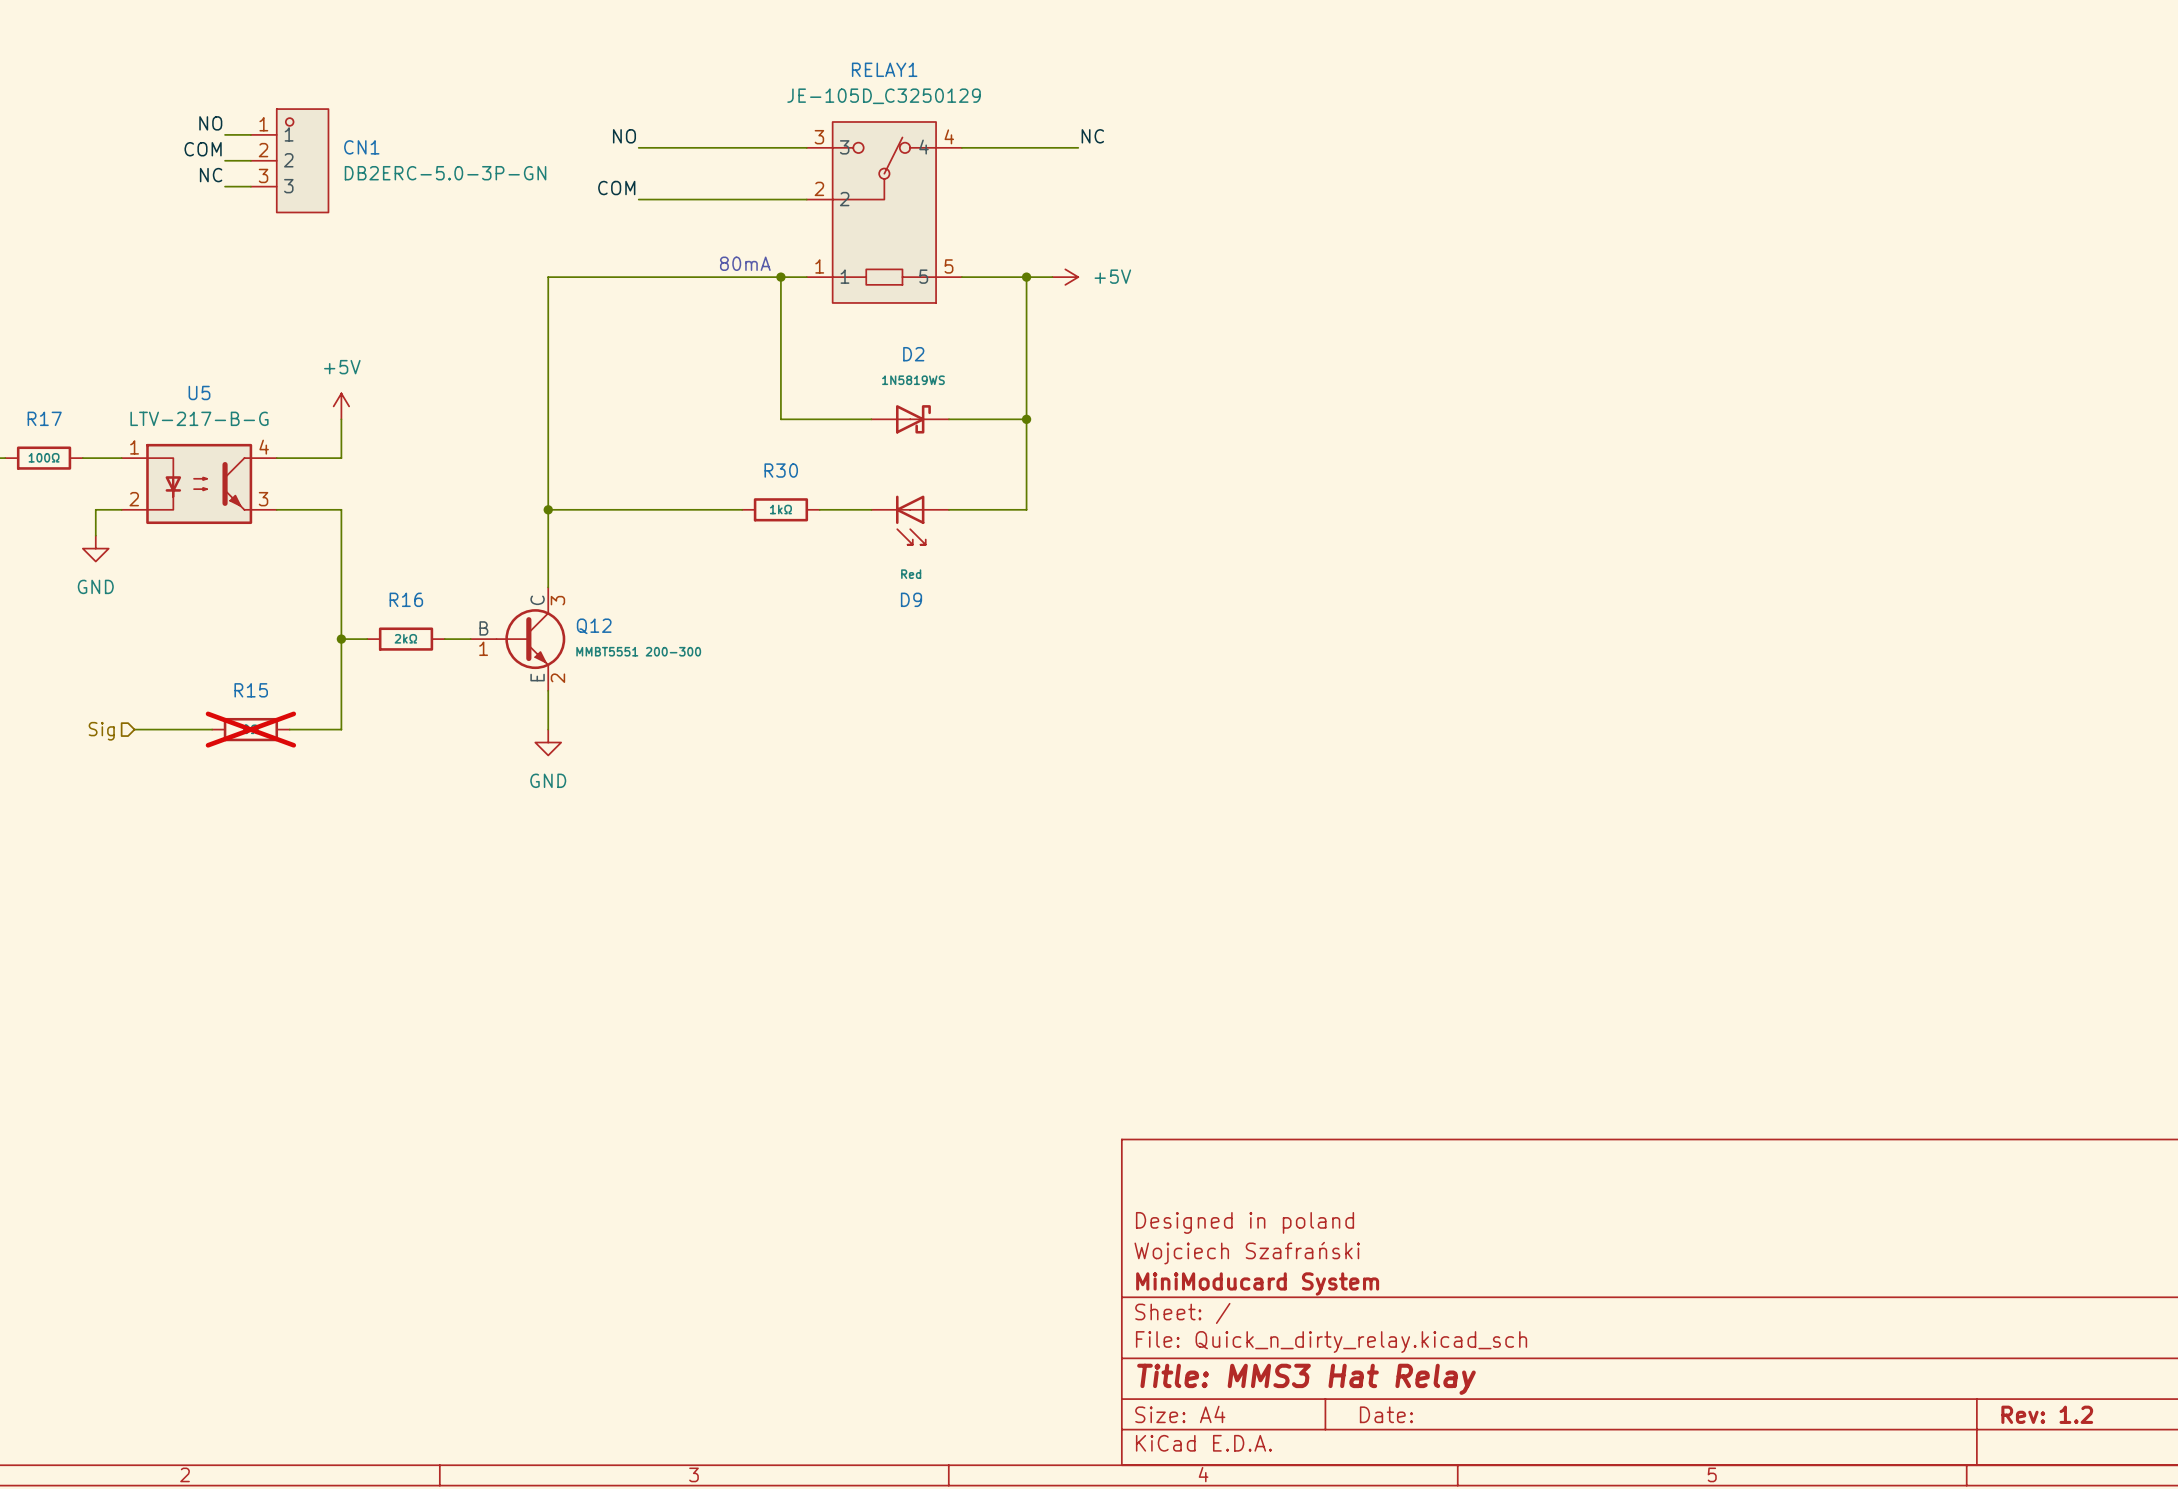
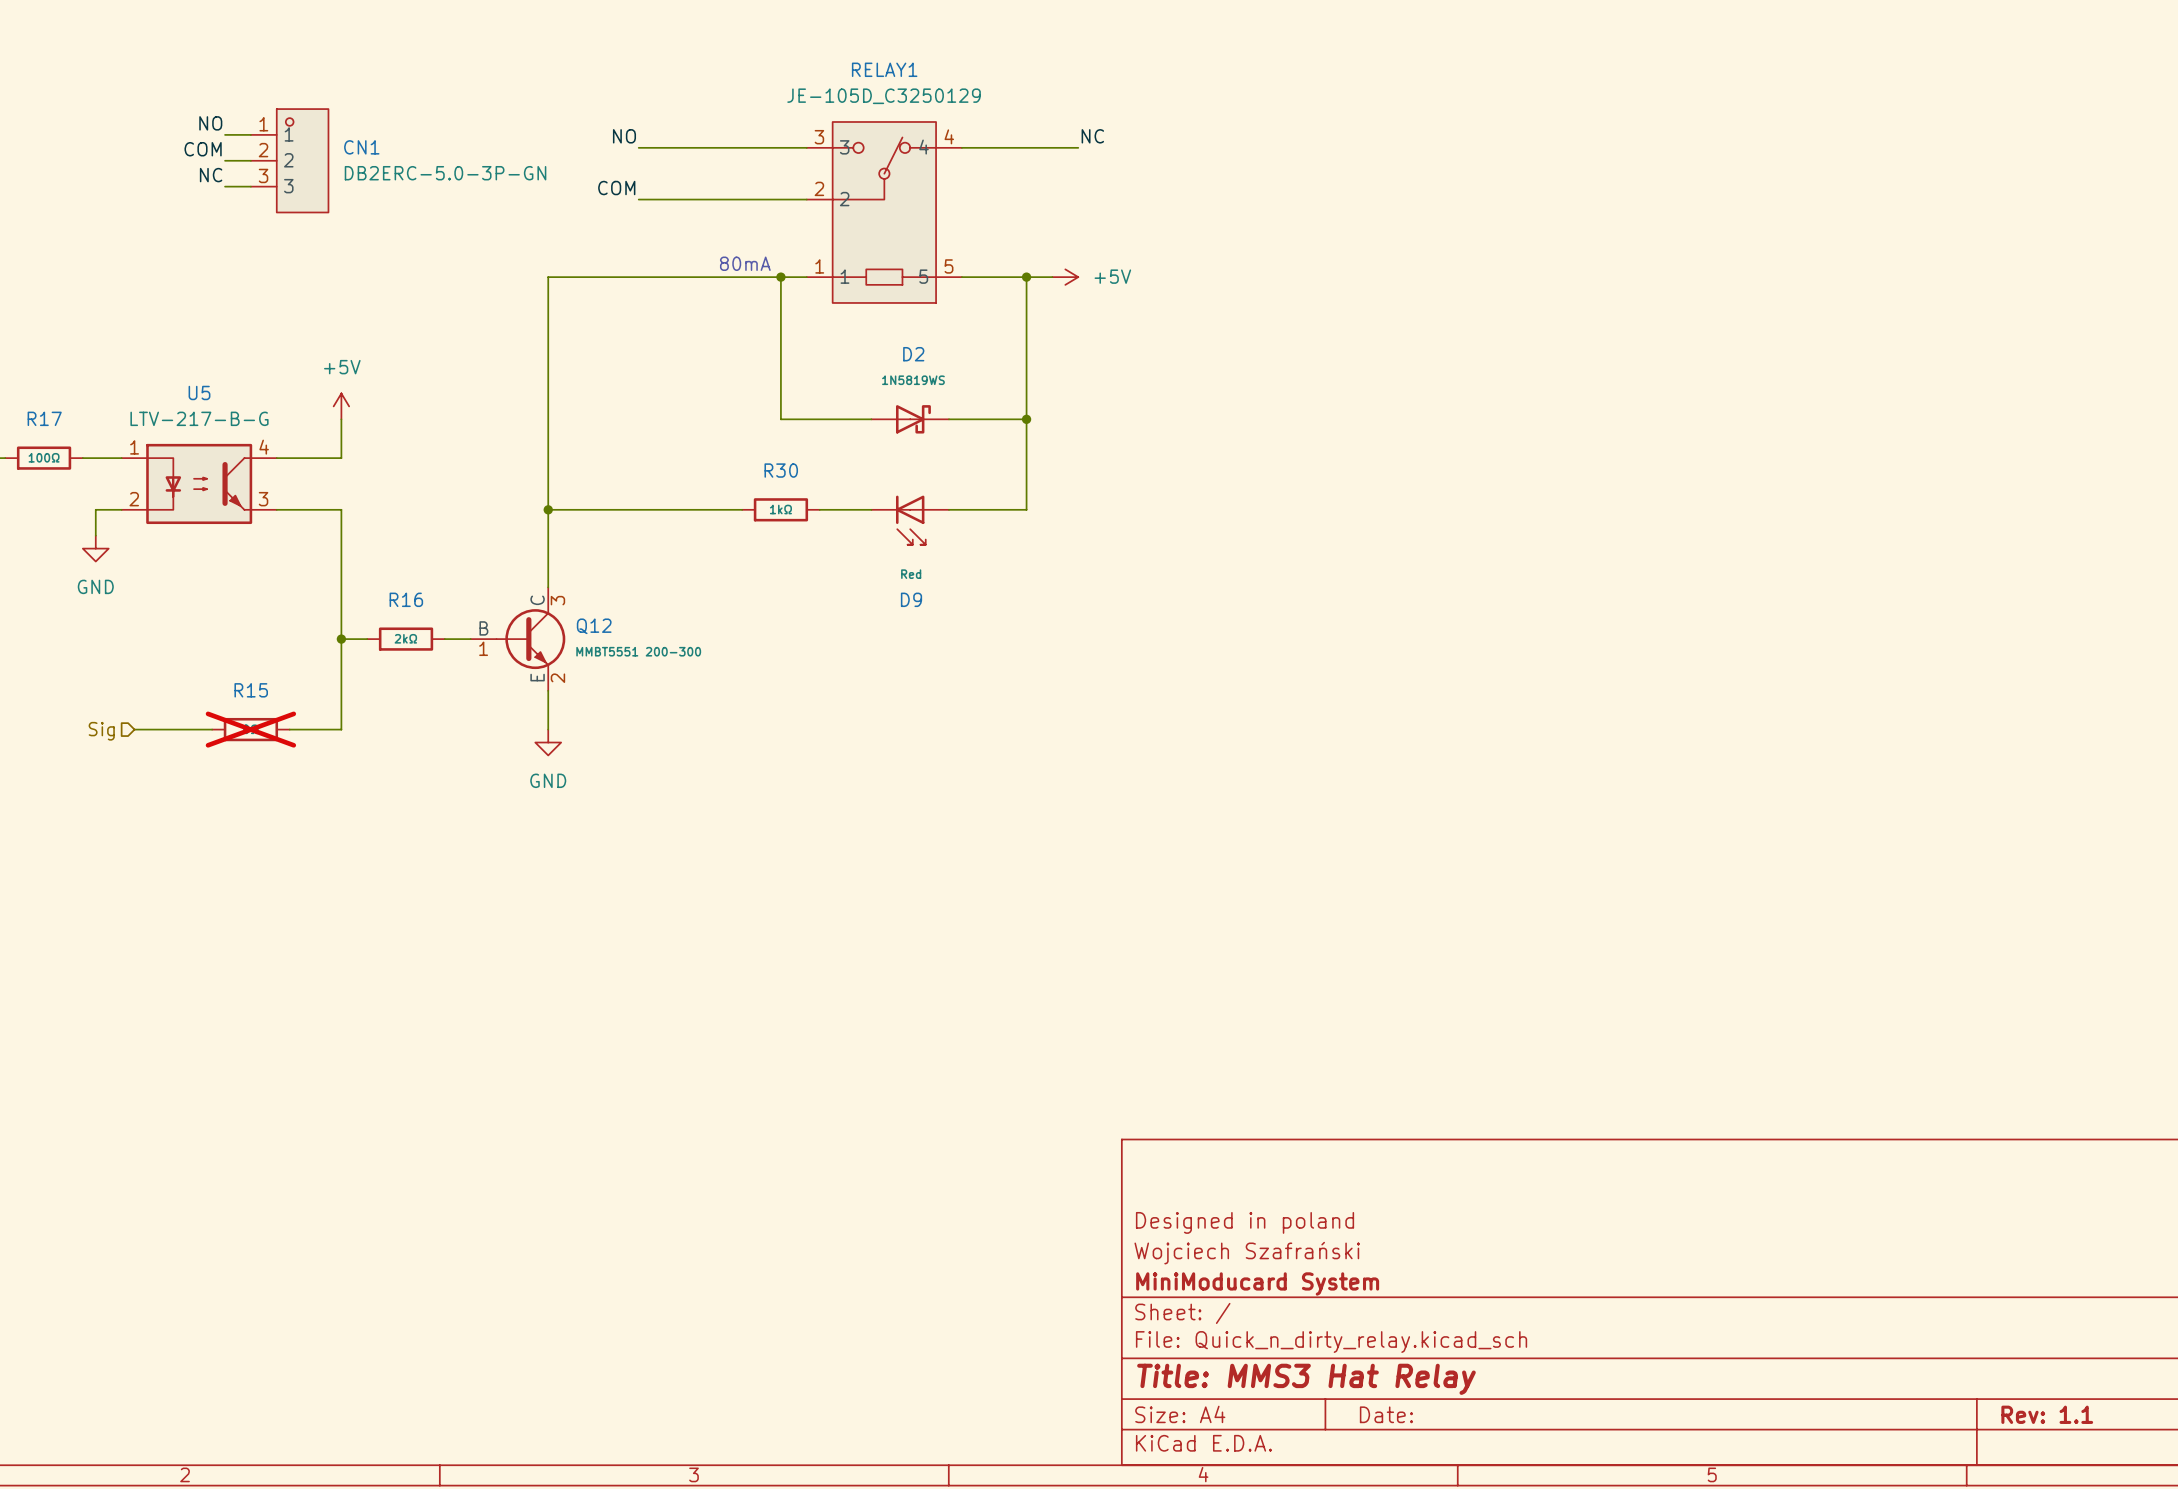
title block: Rev: 1.2 (2047, 1414) -> Rev: 1.1 (2047, 1414)

